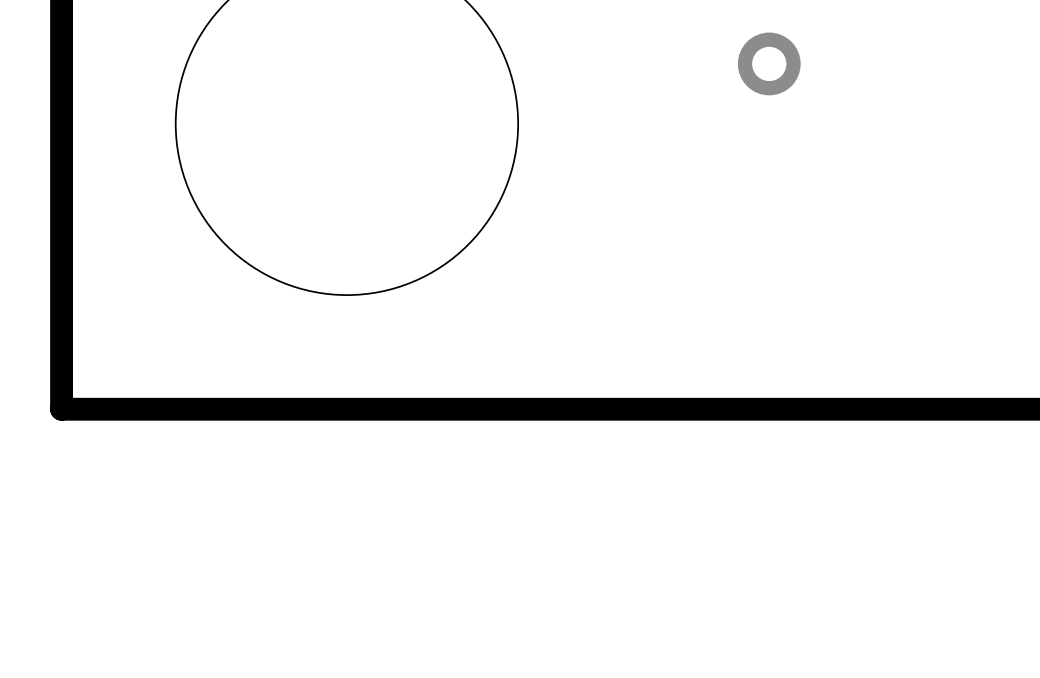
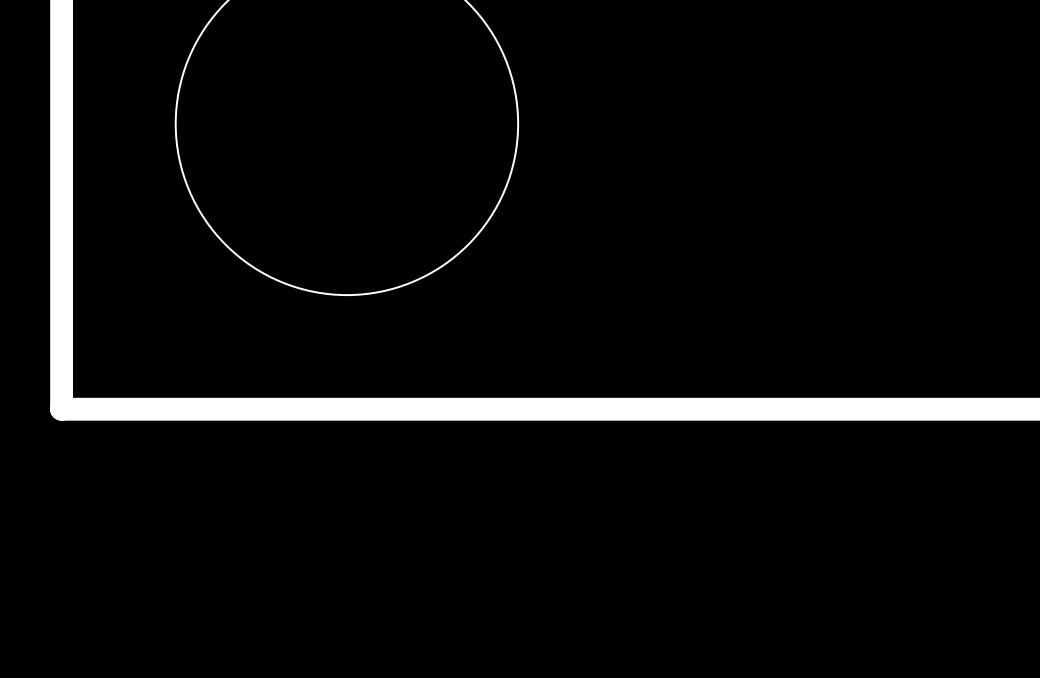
via: (769, 63) -> none

